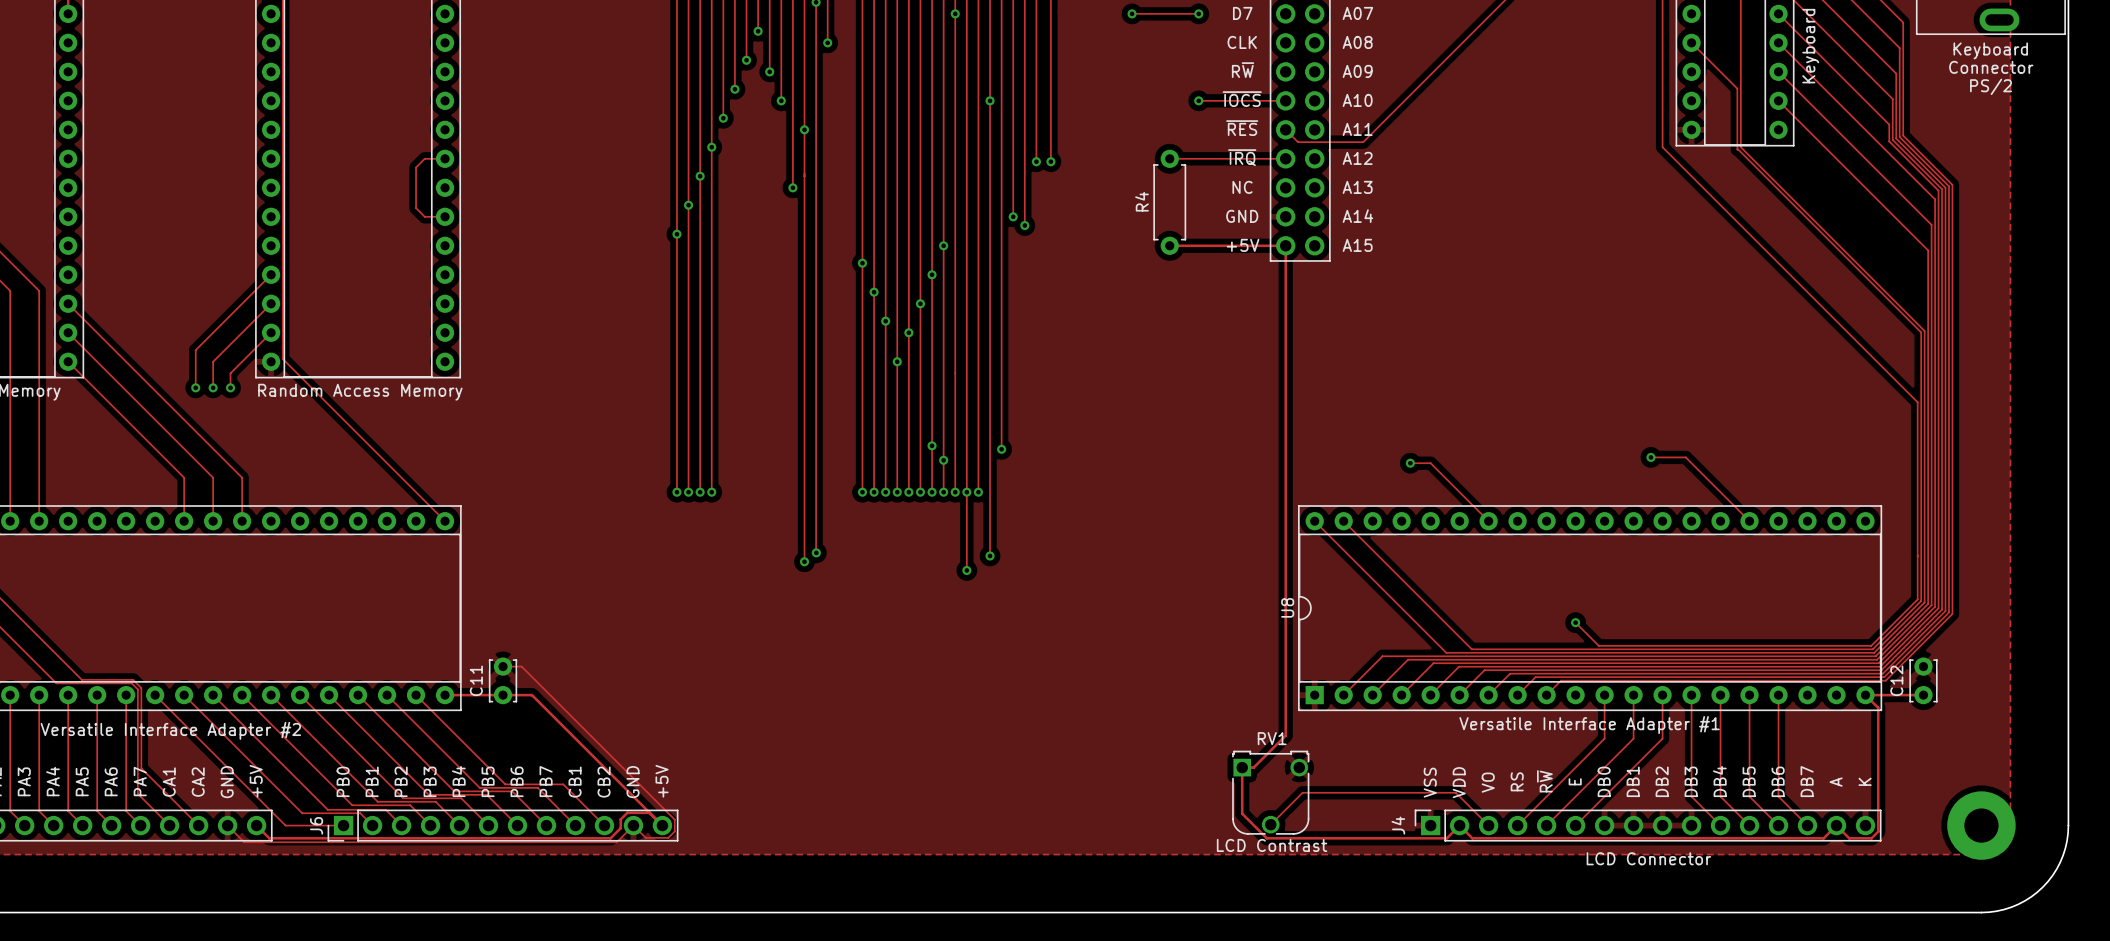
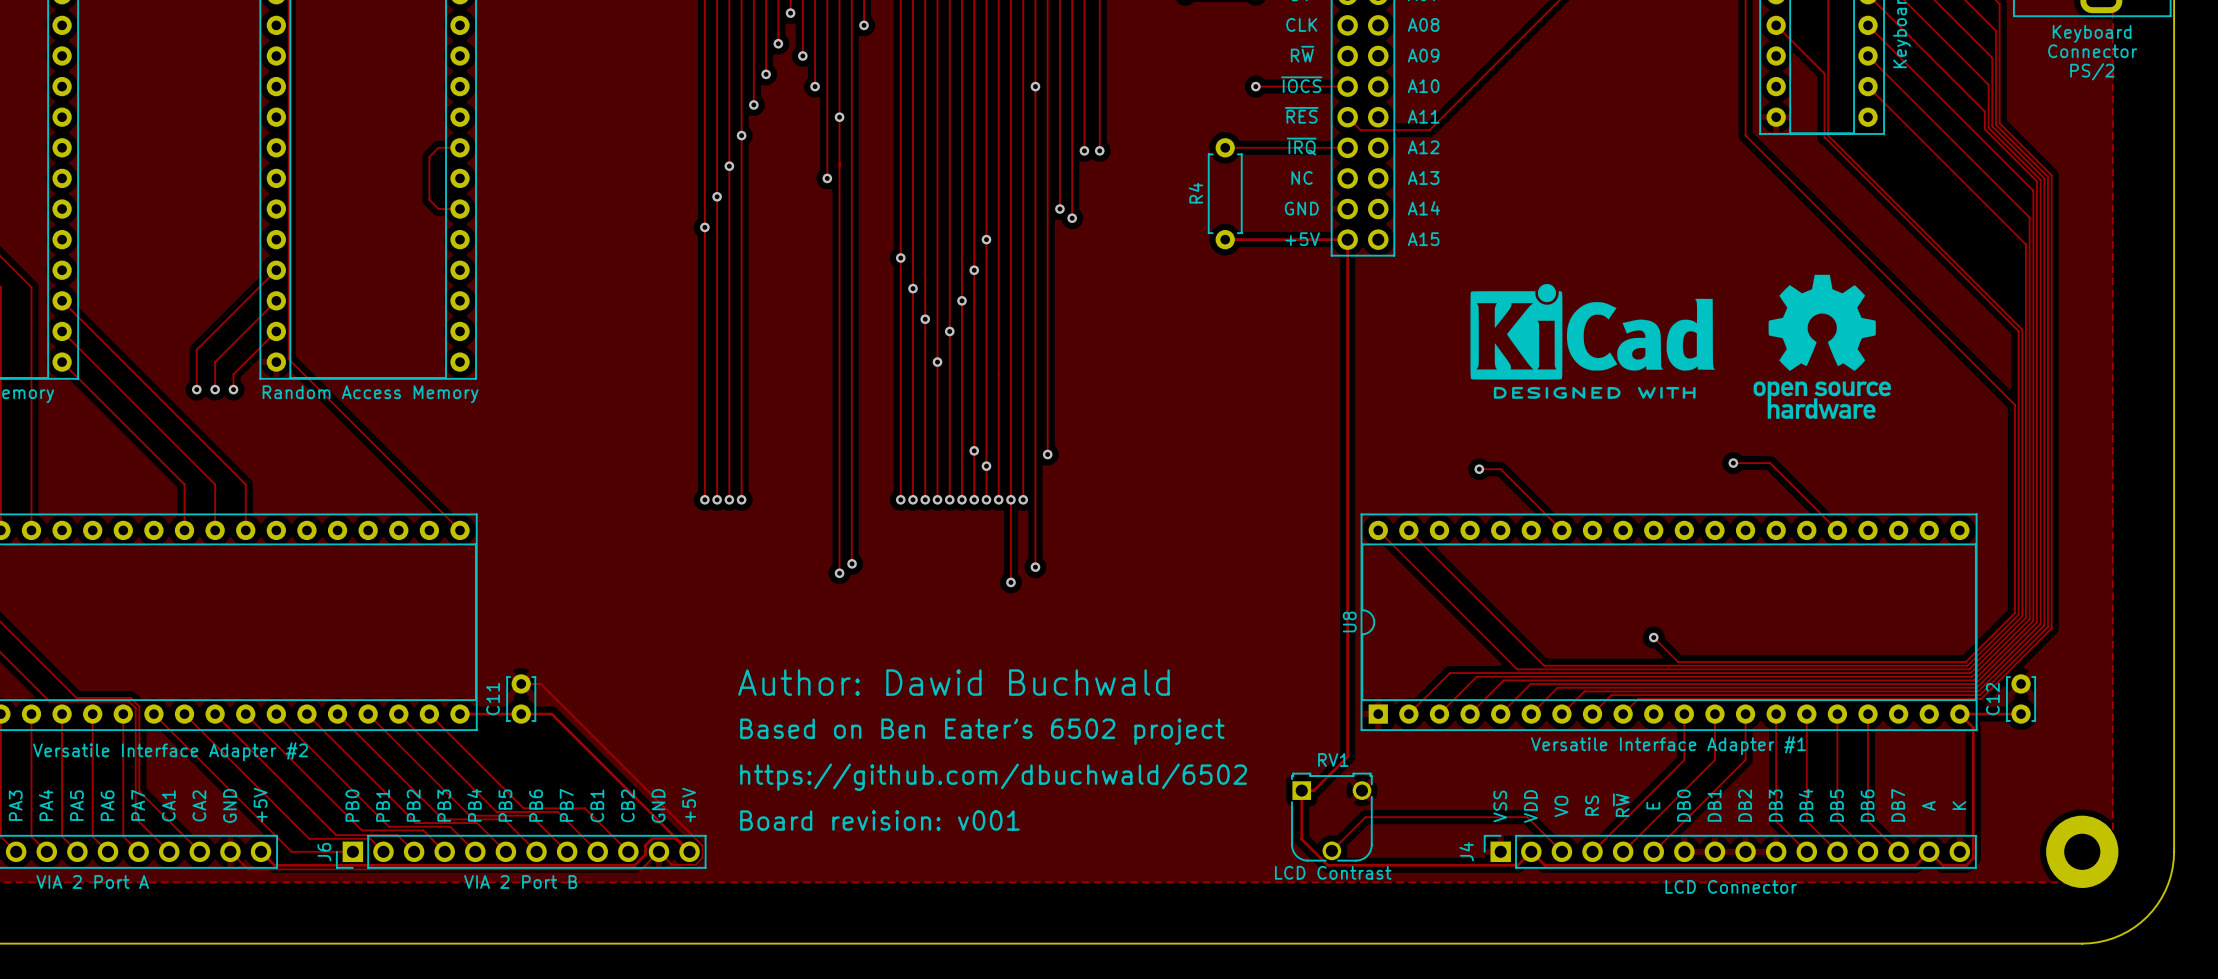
drawing: none -> [1753, 274, 1891, 419]
drawing: none -> [1470, 283, 1715, 399]
text: none -> Author: Dawid Buchwald (953, 682)
text: none -> Based on Ben Eater’s 6502 project (982, 731)
text: none -> https://github.com/dbuchwald/6502 (993, 777)
text: none -> Board revision: v001 (879, 820)
text: none -> VIA 2 Port A (92, 881)
text: none -> VIA 2 Port B (520, 881)

